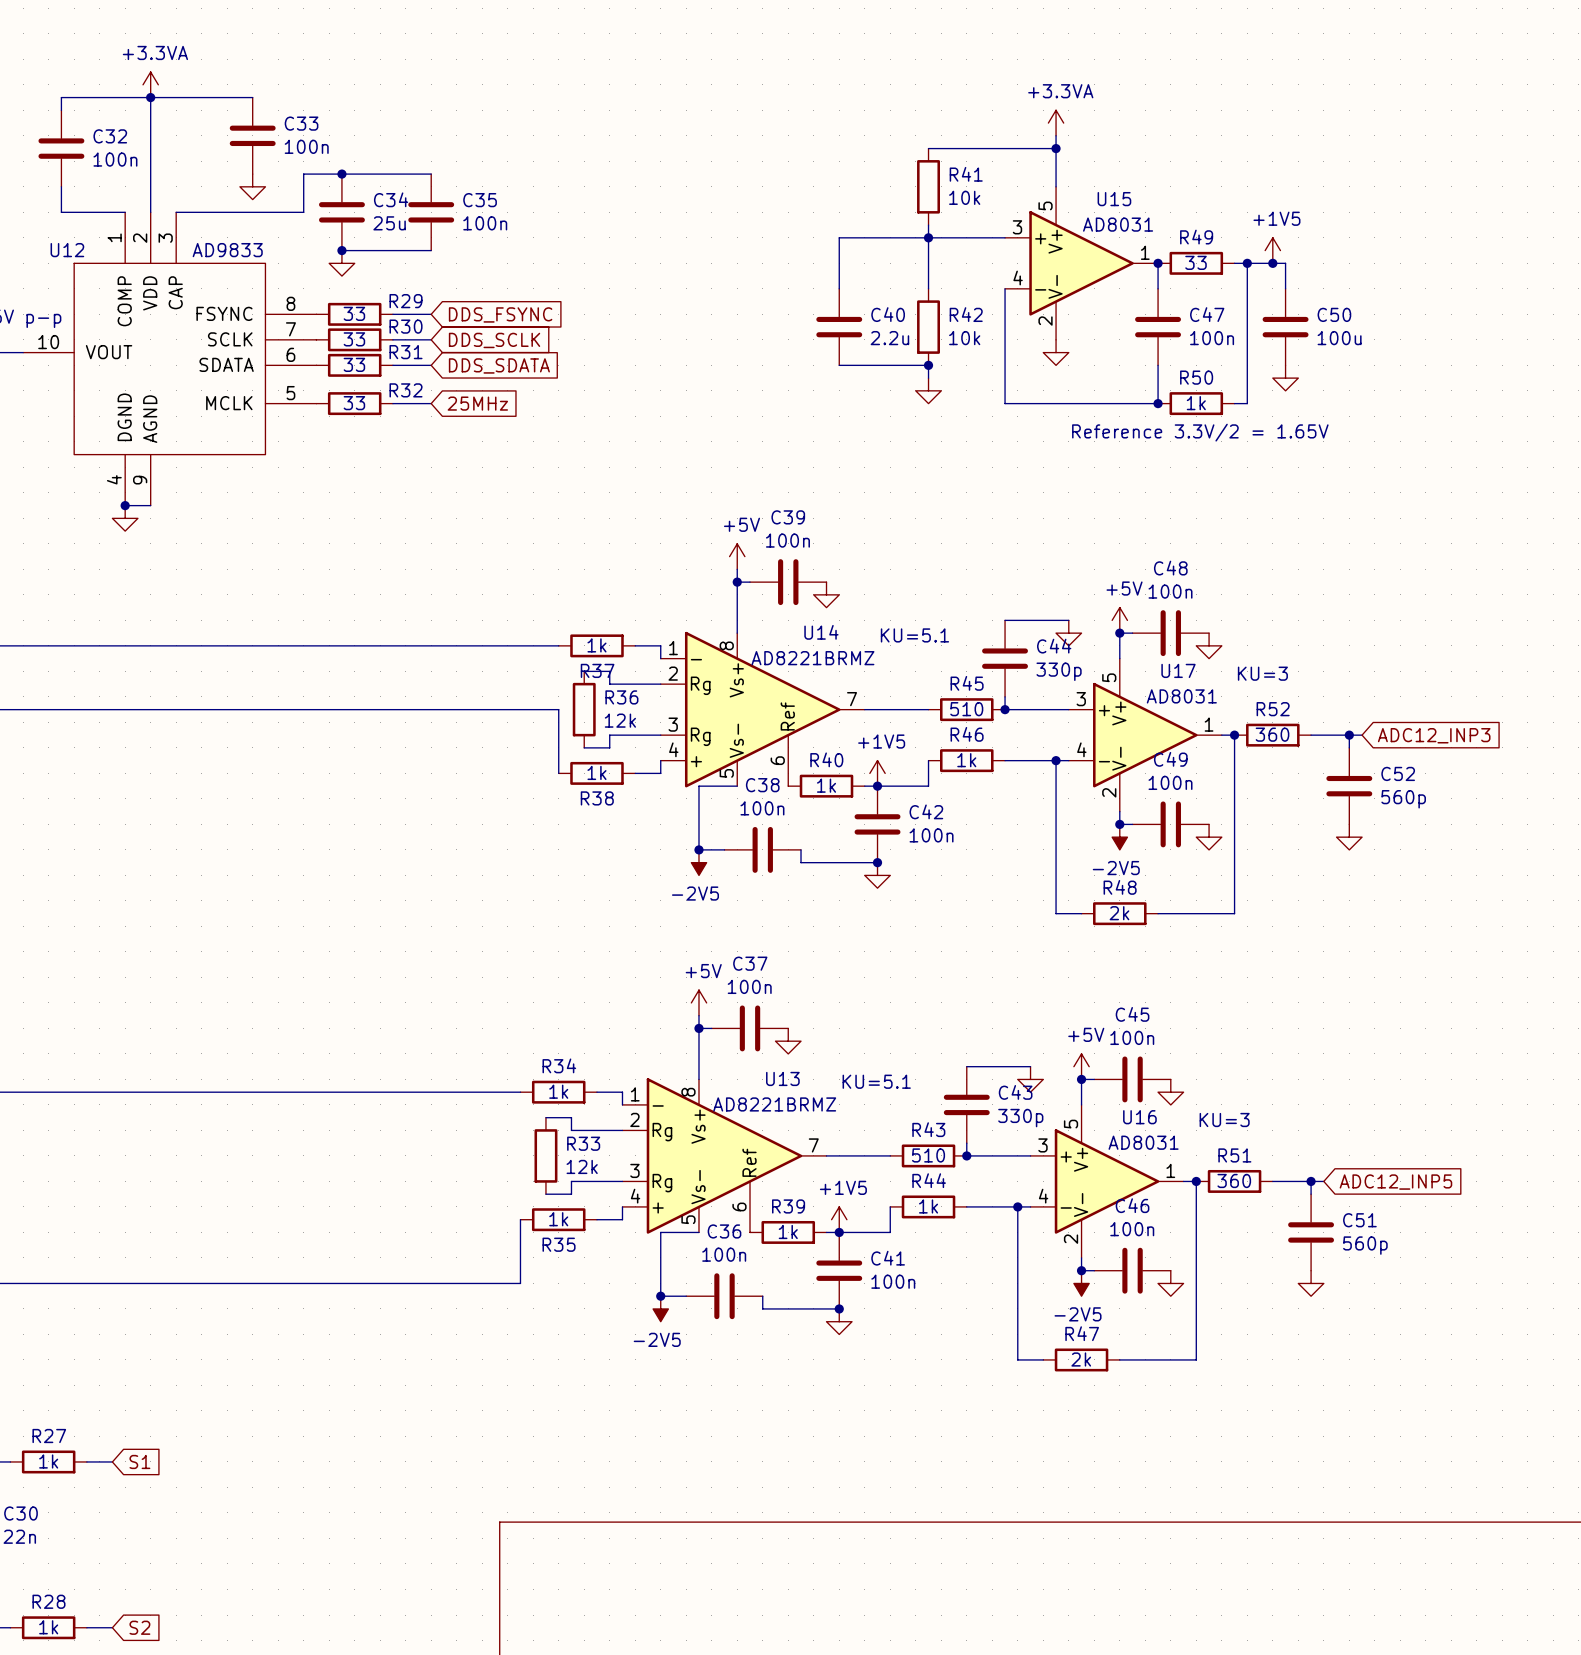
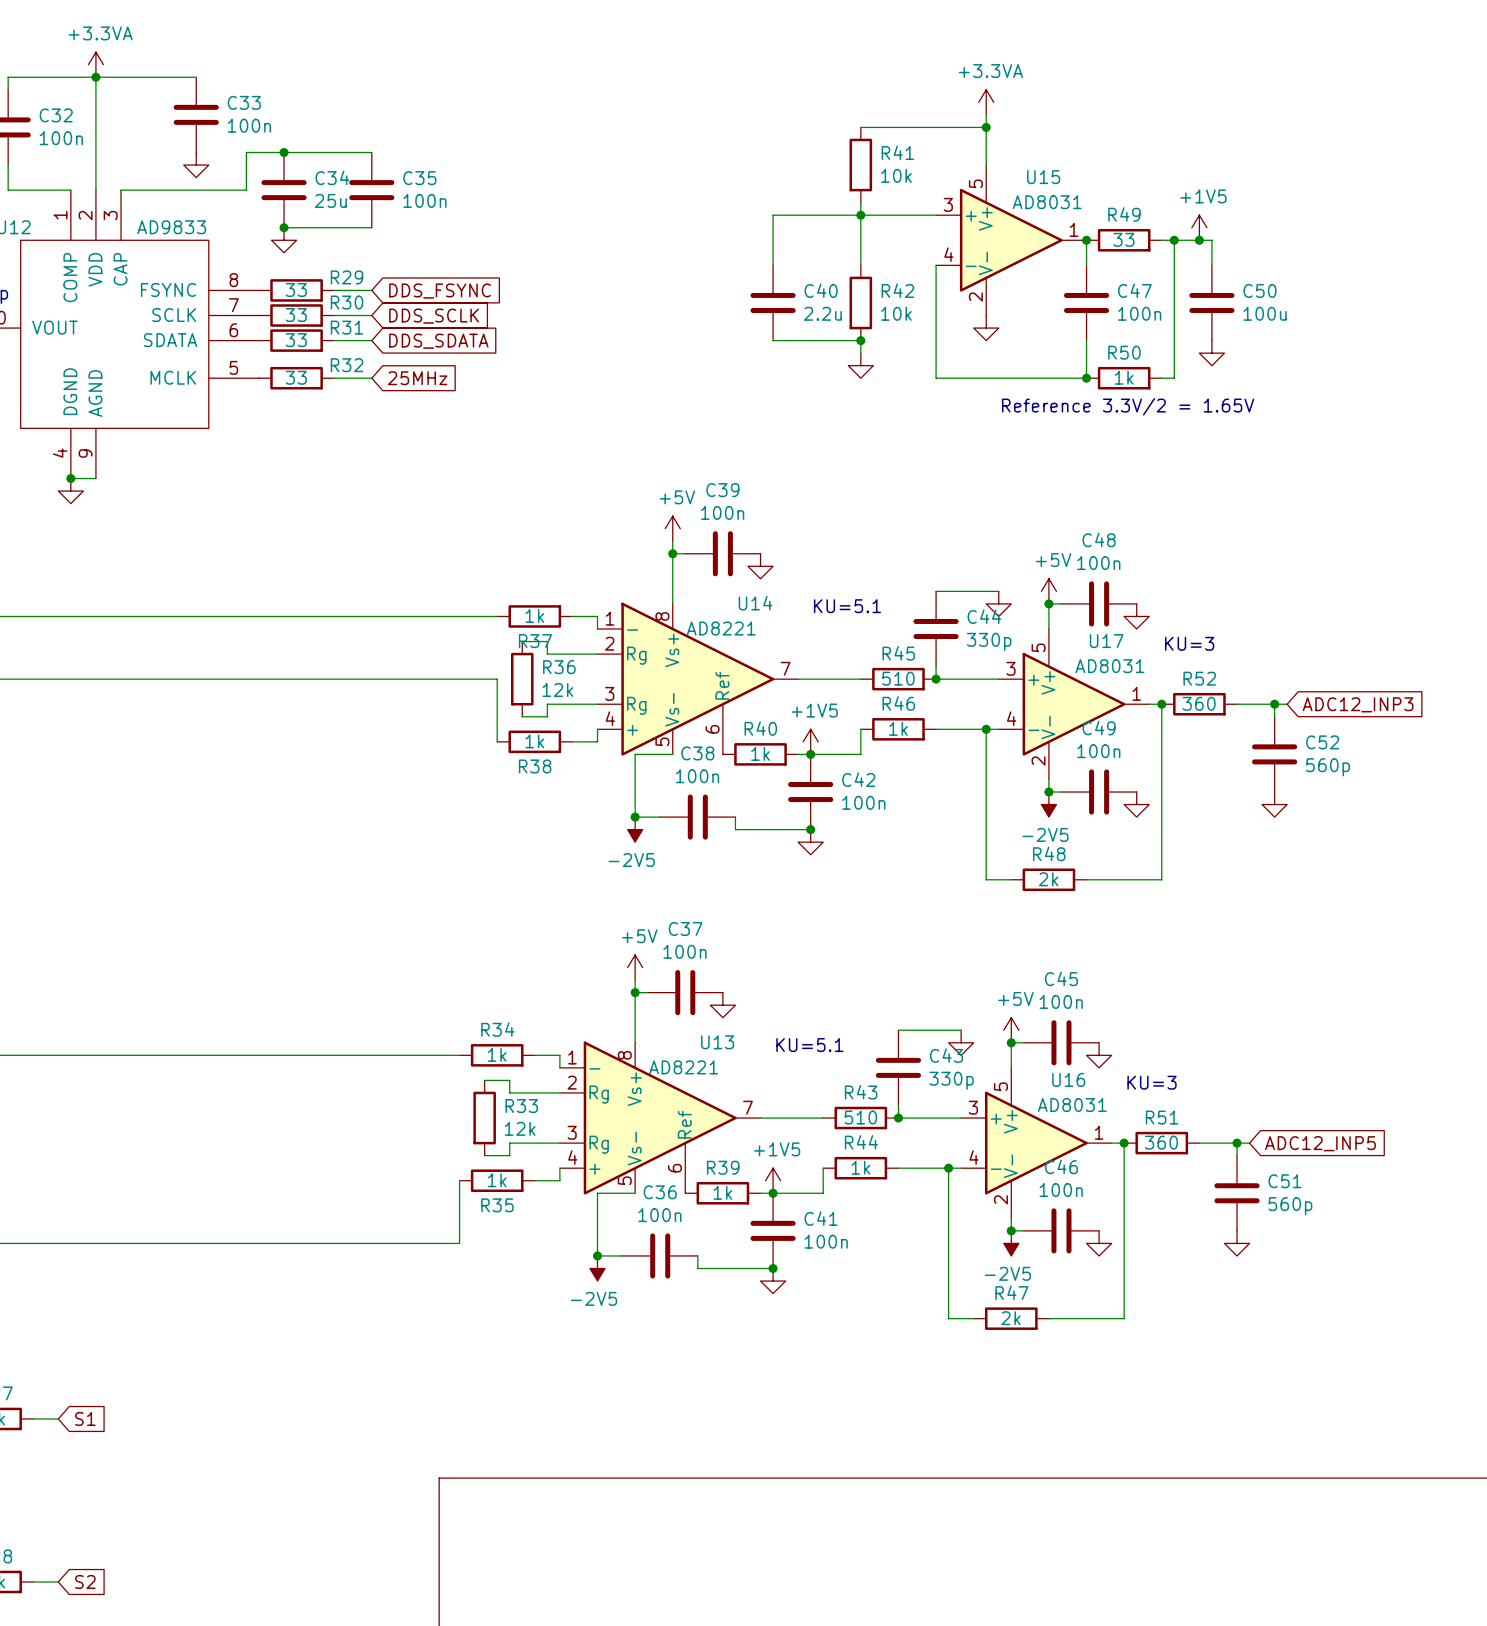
U14 value: AD8221BRMZ (812, 658) -> AD8221 (721, 628)
U13 value: AD8221BRMZ (774, 1104) -> AD8221 (683, 1067)

